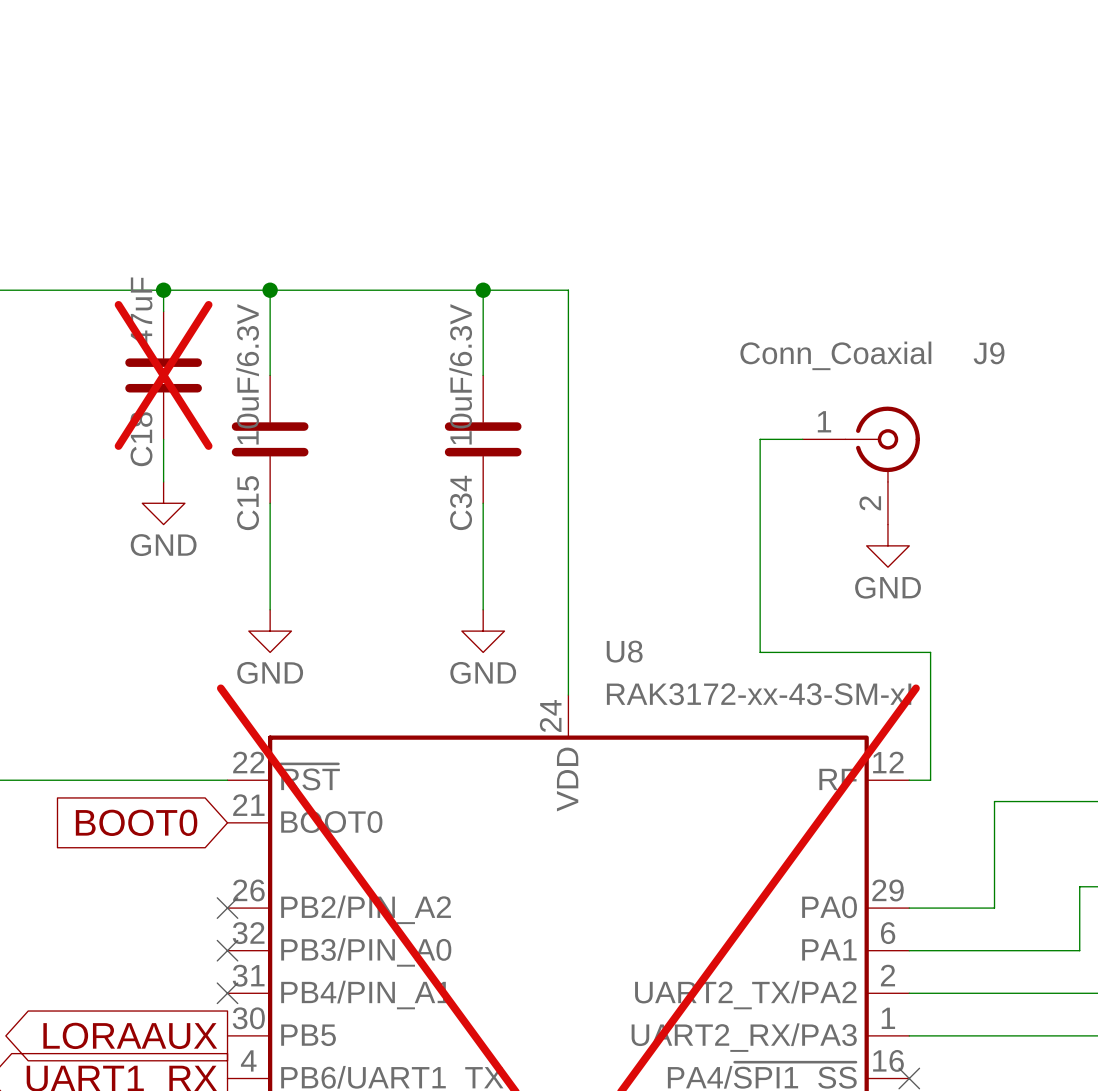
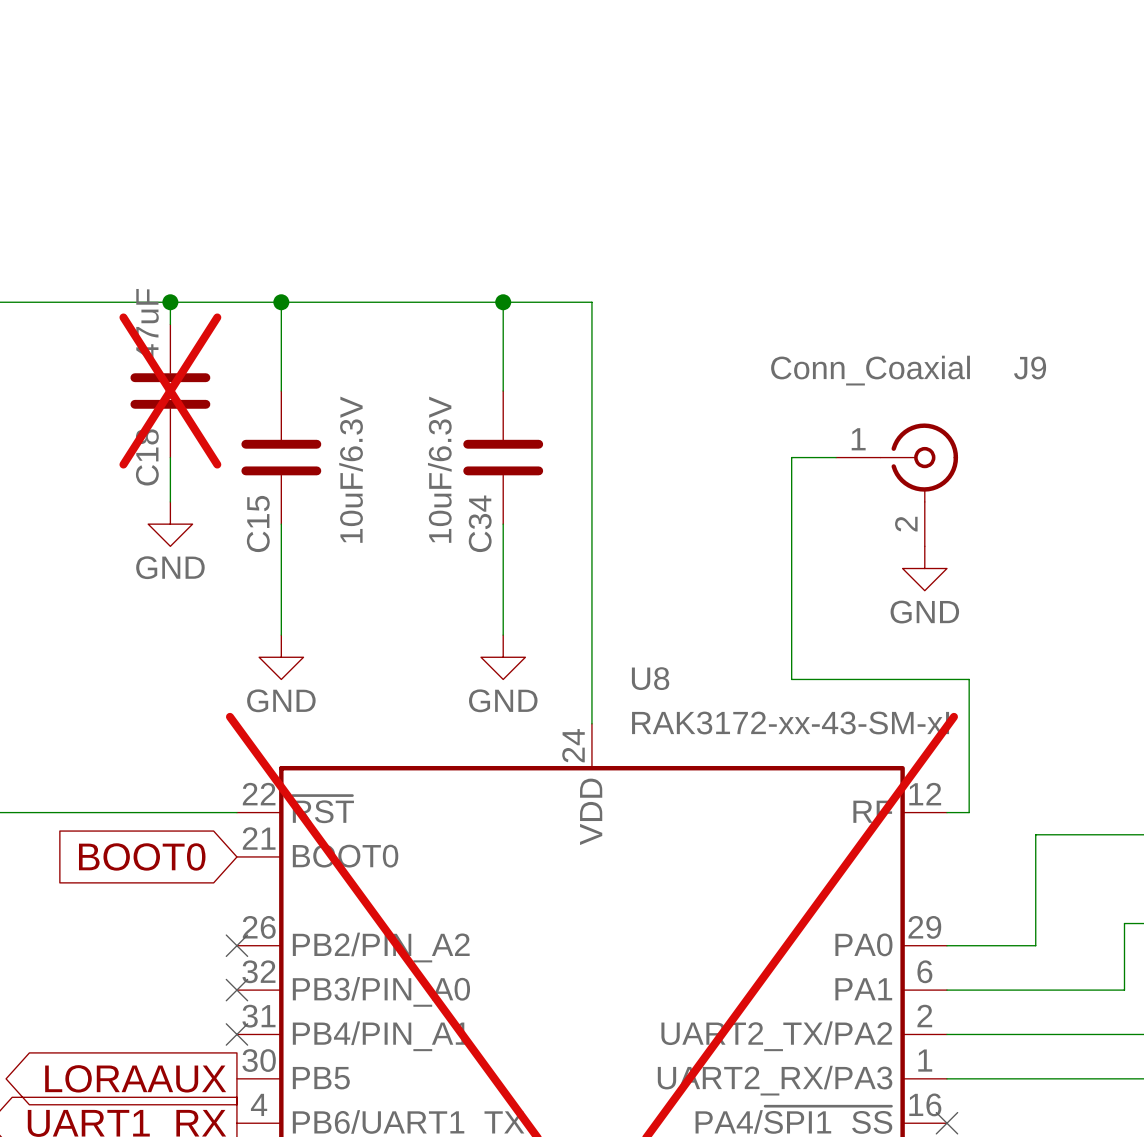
C15 value position: 10uF/6.3V (247, 374) -> 10uF/6.3V (351, 469)
C34 value position: 10uF/6.3V (460, 374) -> 10uF/6.3V (439, 469)

